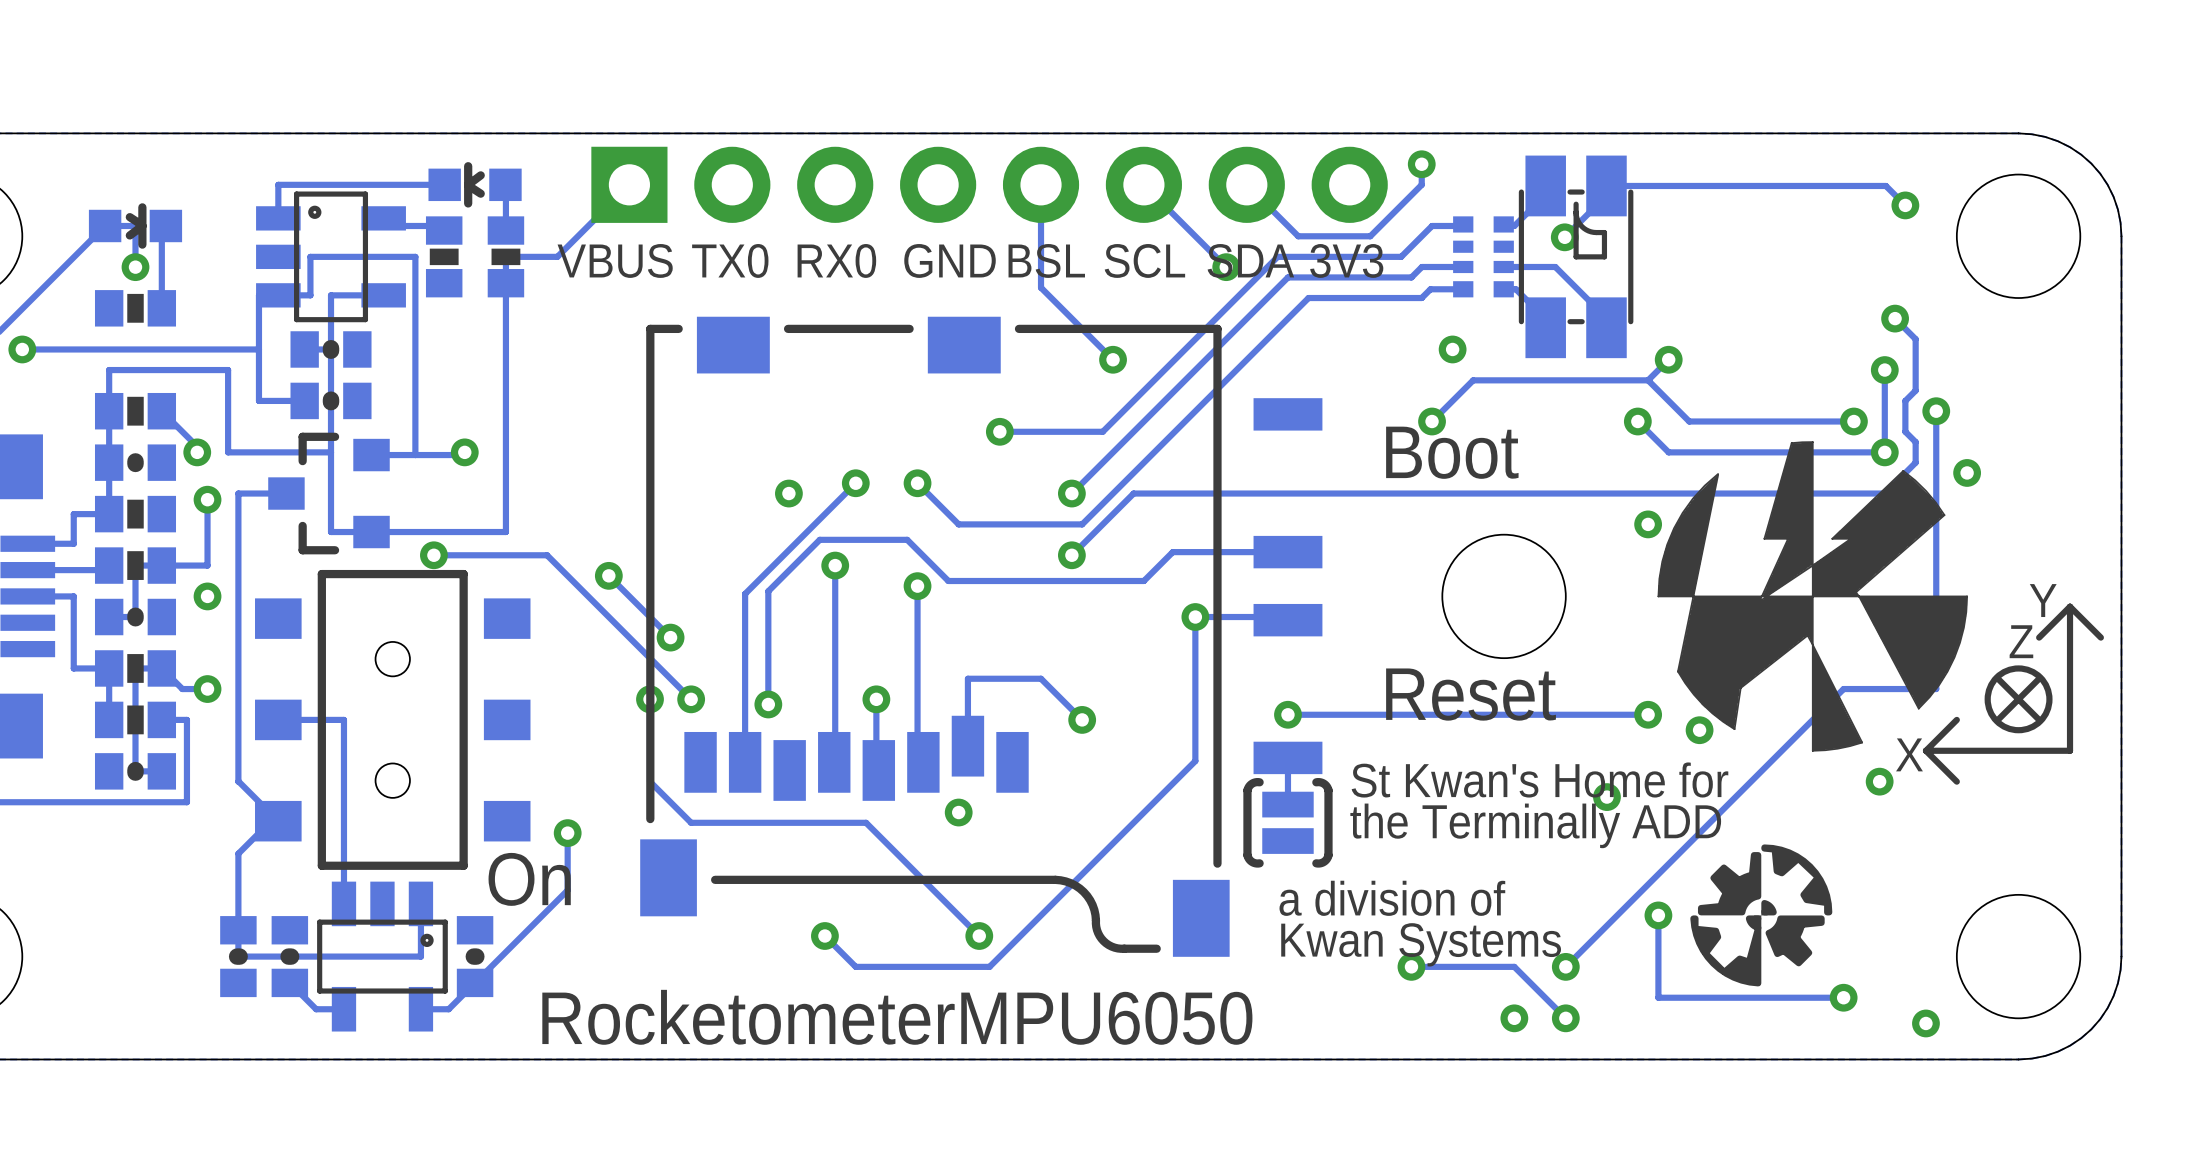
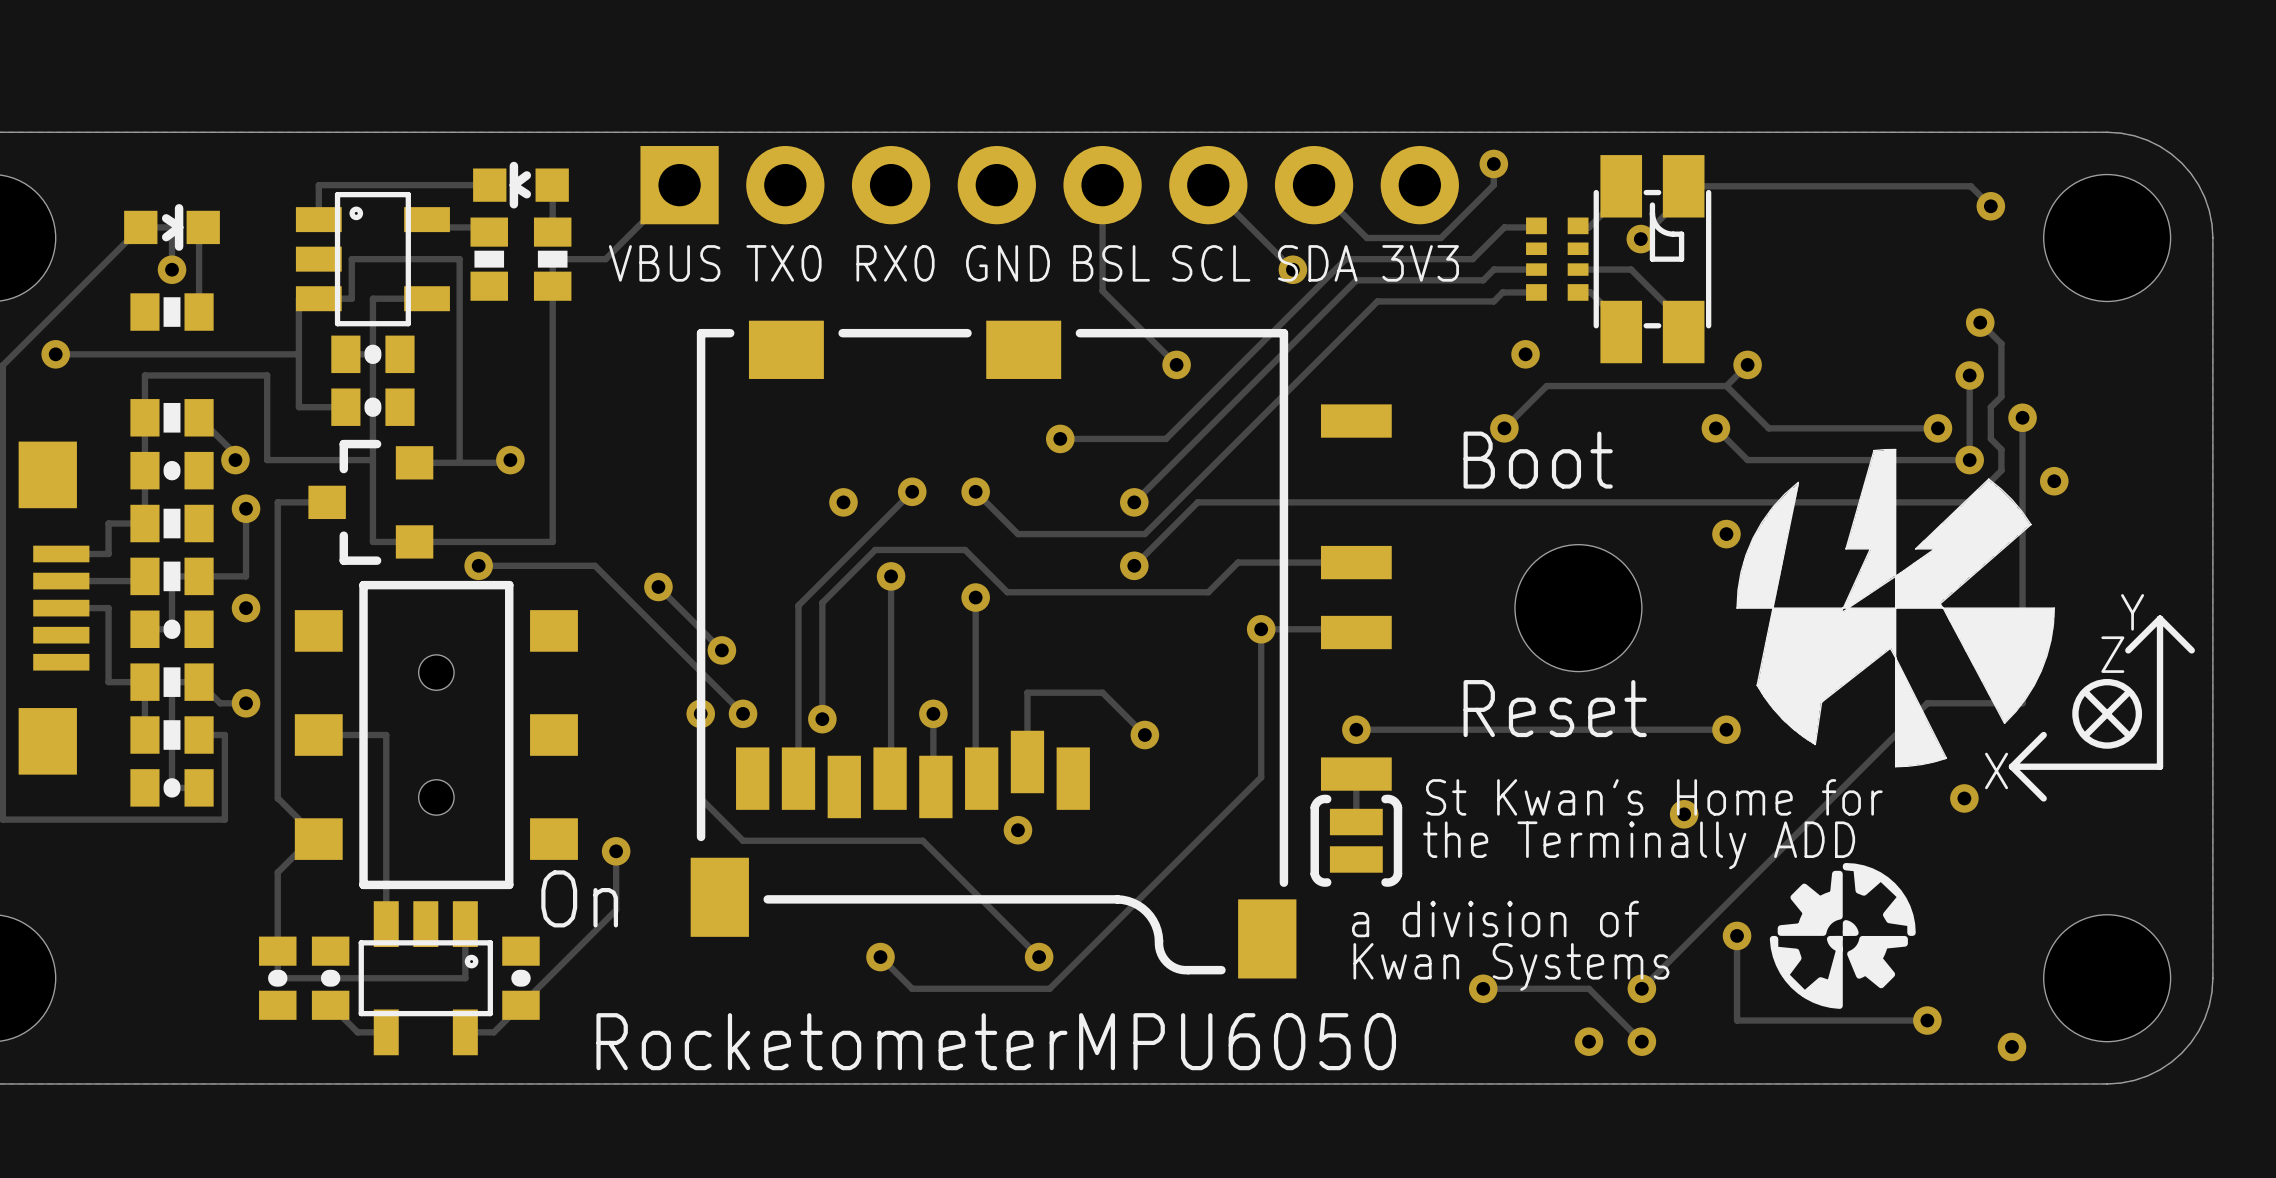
via: (1699, 730) -> none

